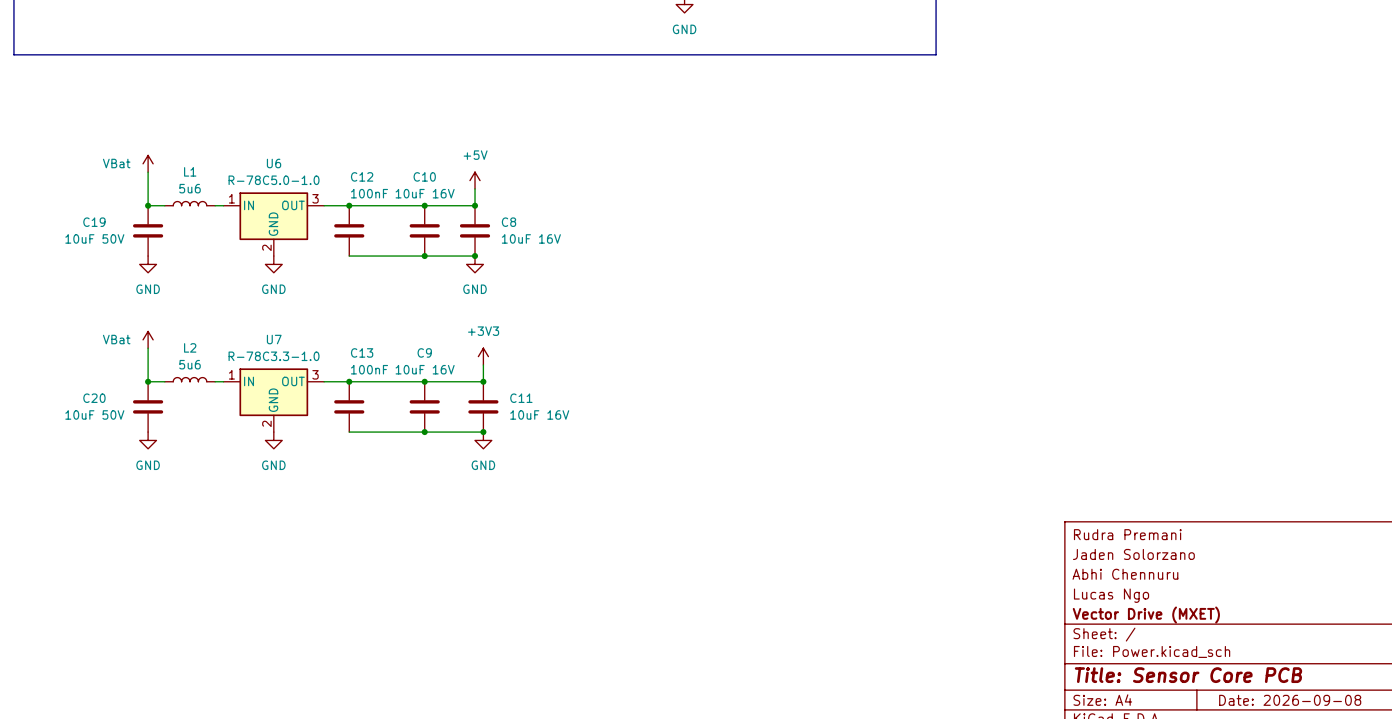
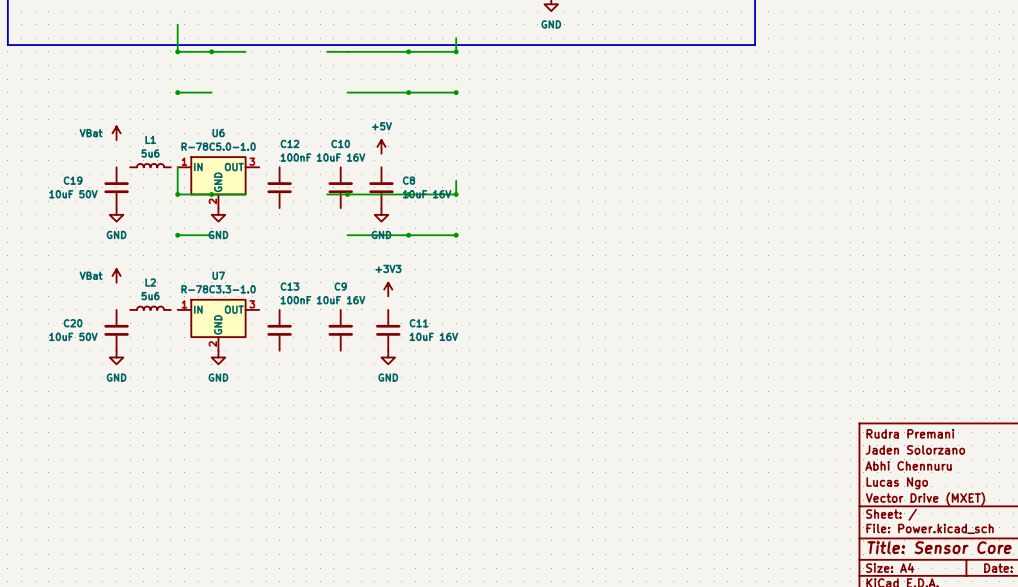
wire: none -> (177, 24) (177, 51) (245, 51)
wire: none -> (456, 38) (456, 51) (327, 51)
junction: none -> (177, 51)
junction: none -> (211, 51)
junction: none -> (408, 51)
junction: none -> (456, 51)
wire: none -> (177, 92) (211, 92)
junction: none -> (177, 92)
wire: none -> (347, 92) (456, 92)
junction: none -> (408, 92)
junction: none -> (456, 92)
wire: (148, 172) (148, 205) (164, 205) -> none
wire: (475, 188) (475, 205) (324, 205) -> none
junction: (148, 205) -> none
wire: (215, 205) (223, 205) -> (245, 194) (177, 194) (177, 167)
junction: (349, 205) -> none
junction: (424, 205) -> none
junction: (475, 205) -> none
wire: none -> (456, 180) (456, 194) (327, 194)
junction: none -> (177, 194)
junction: none -> (211, 194)
junction: none -> (347, 194)
junction: none -> (408, 194)
junction: none -> (456, 194)
wire: (349, 256) (475, 256) -> none
junction: (424, 256) -> none
junction: (475, 256) -> none
wire: none -> (177, 235) (211, 235)
junction: none -> (177, 235)
wire: none -> (347, 235) (456, 235)
junction: none -> (408, 235)
junction: none -> (456, 235)
wire: (148, 348) (148, 381) (164, 381) -> none
wire: (483, 364) (483, 381) (324, 381) -> none
junction: (148, 381) -> none
wire: (215, 381) (223, 381) -> none
junction: (349, 381) -> none
junction: (424, 381) -> none
junction: (483, 381) -> none
wire: (349, 432) (483, 432) -> none
junction: (424, 432) -> none
junction: (483, 432) -> none

